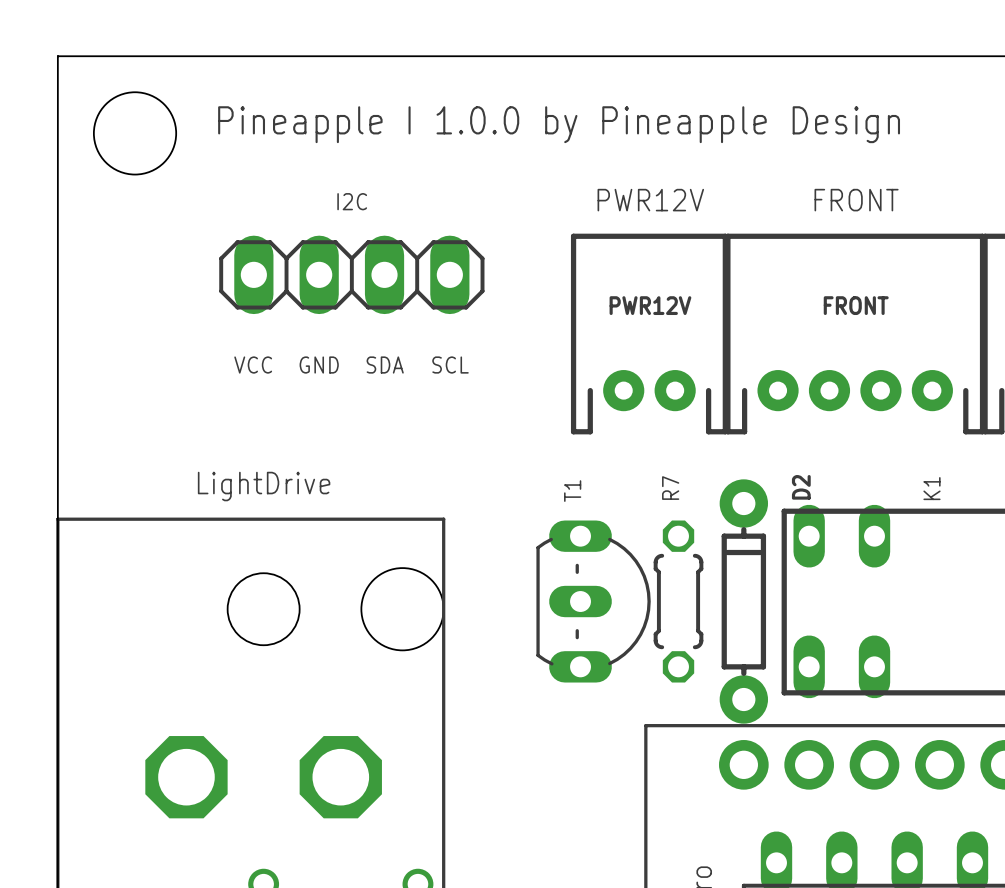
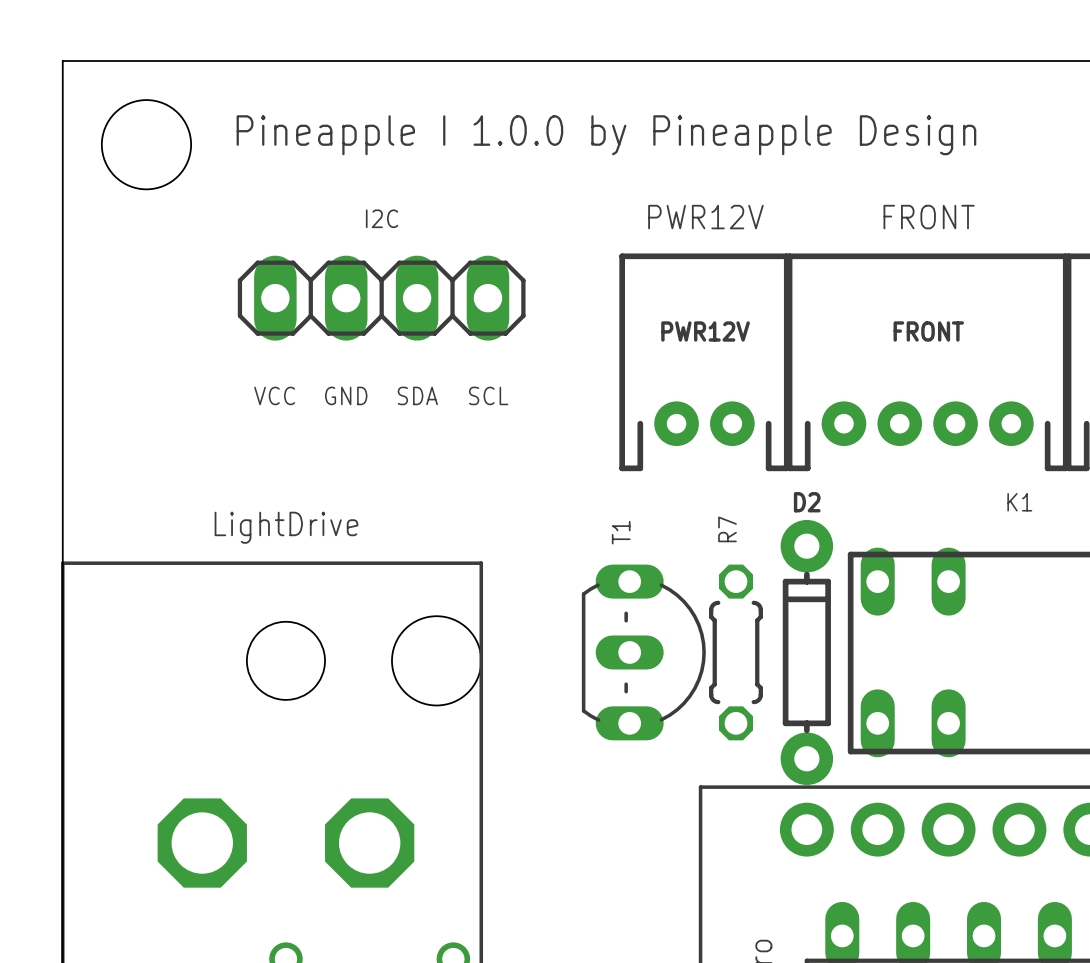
D2 name rotation: 0° (801, 487) -> 90° clockwise (807, 502)
D2 name position: D2 (801, 487) -> D2 (807, 502)
K1 name rotation: 0° (931, 488) -> 90° clockwise (1019, 502)

